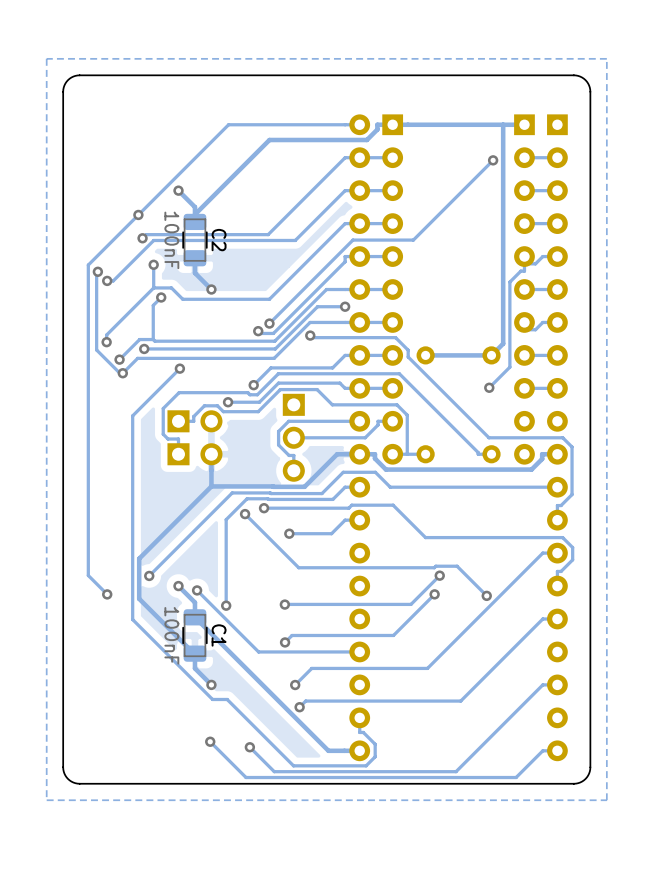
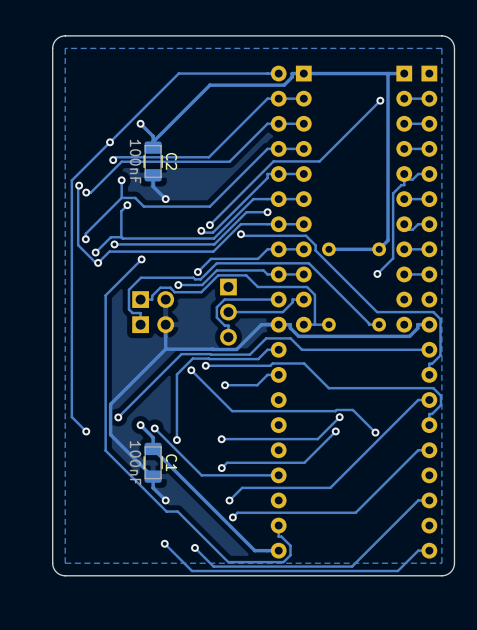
zone outline: (606, 58) (606, 800) (46, 800) (46, 58) (606, 58) -> (441, 48) (441, 563) (65, 563) (65, 48) (441, 48)

